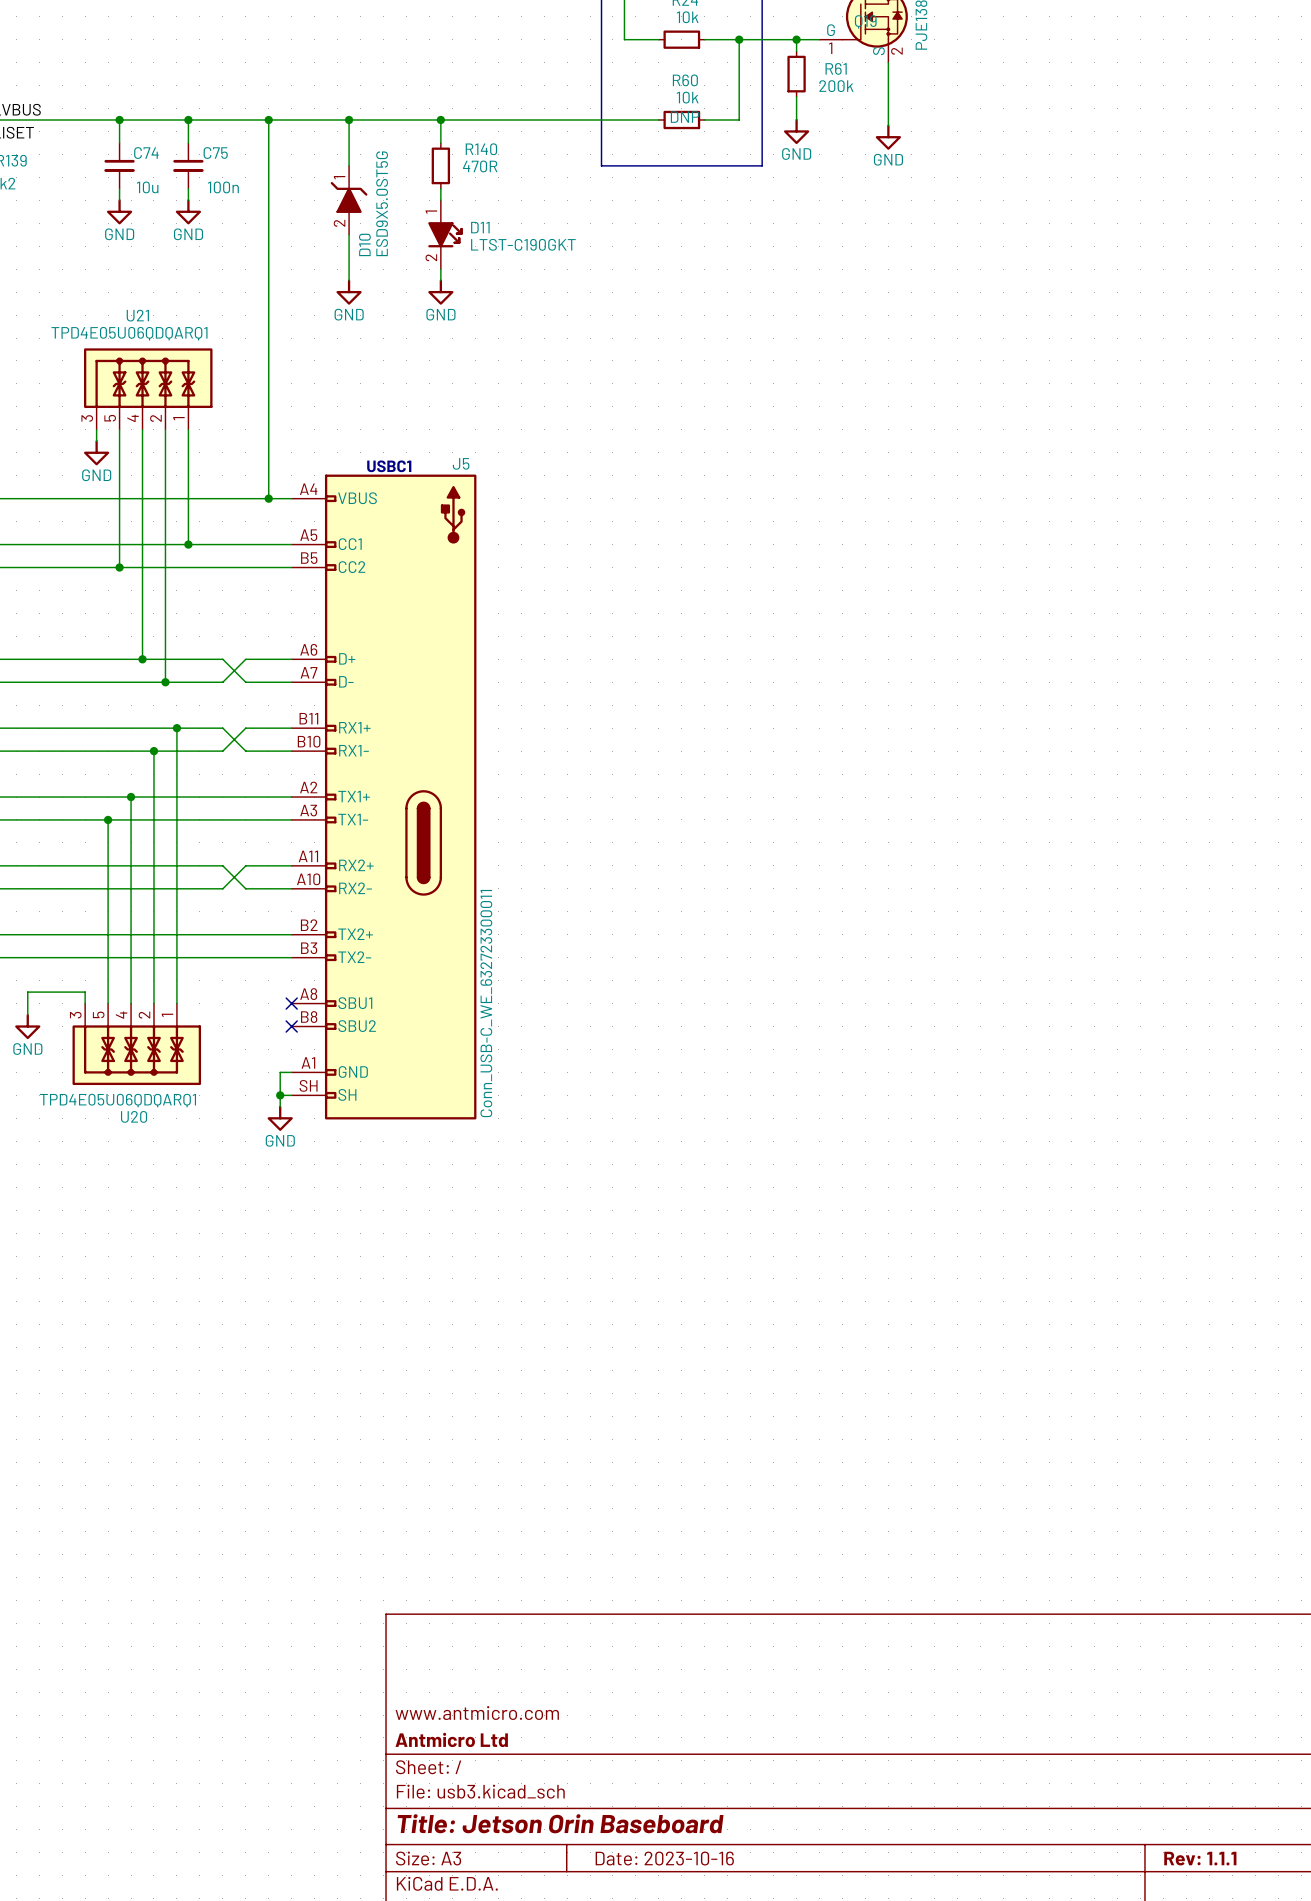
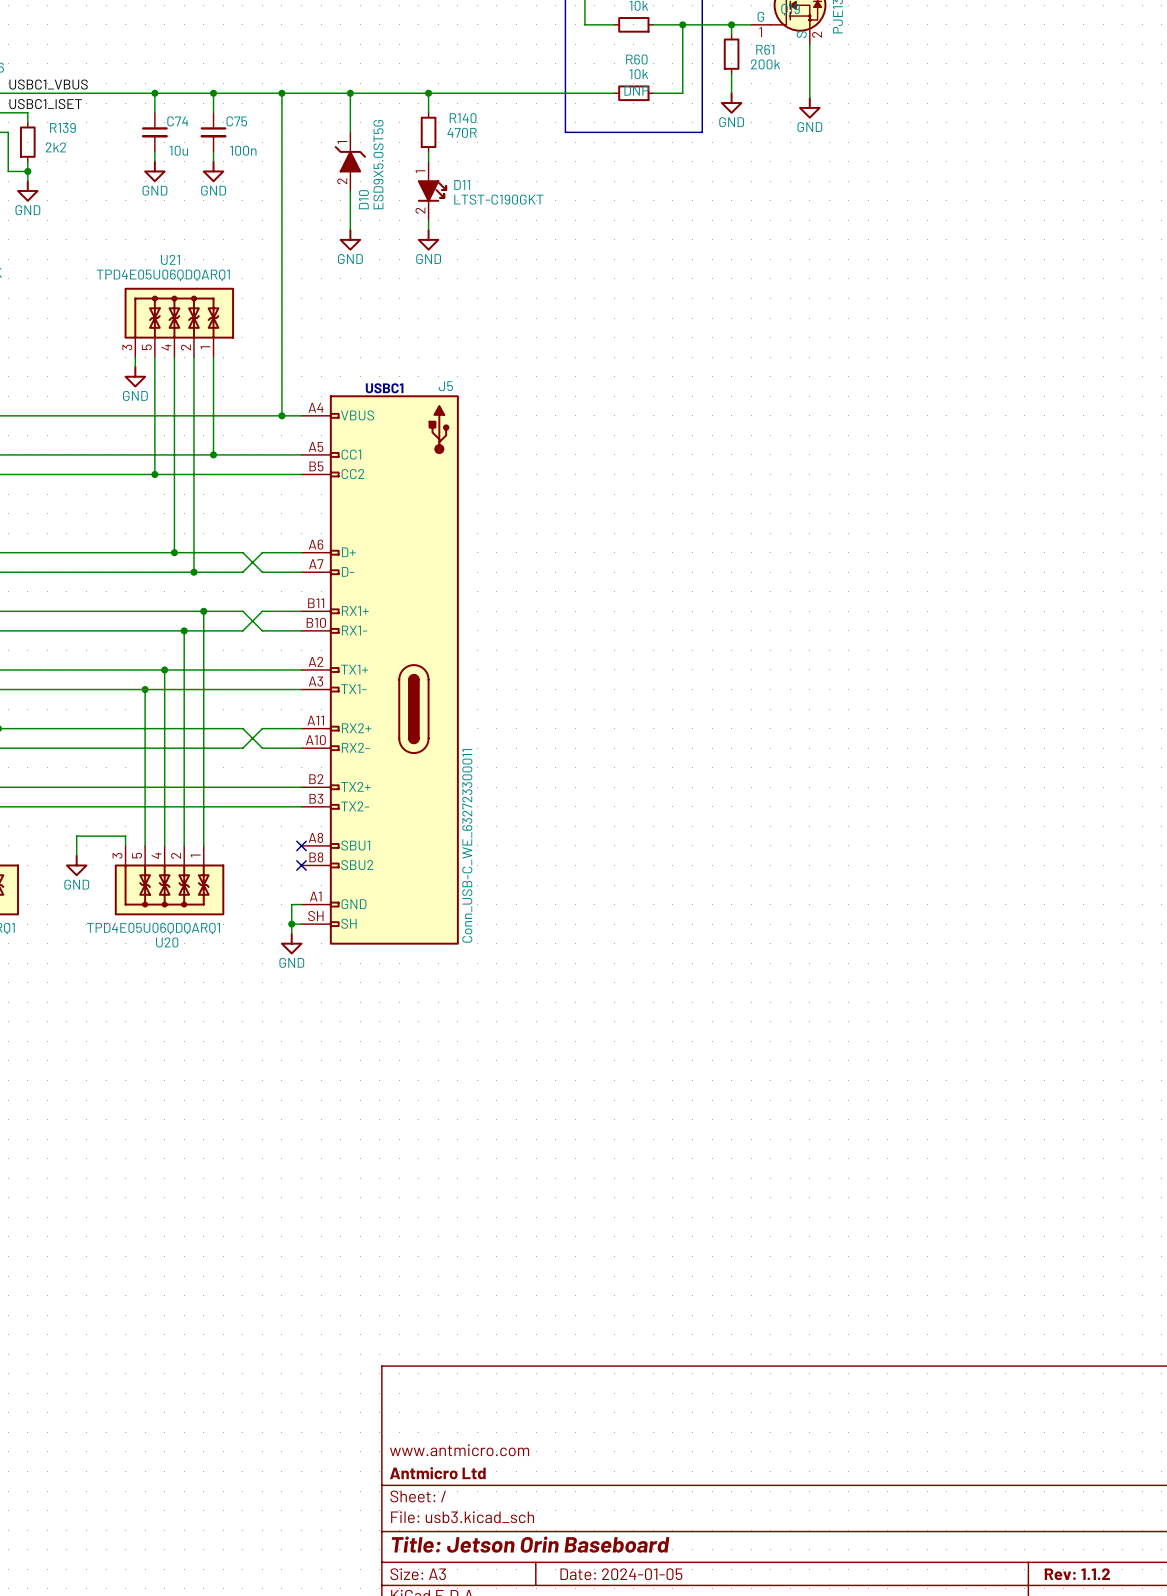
title block: Date: 2023-10-16 (664, 1858) -> Date: 2024-01-05 (621, 1574)
title block: Rev: 1.1.1 (1200, 1858) -> Rev: 1.1.2 (1077, 1574)

